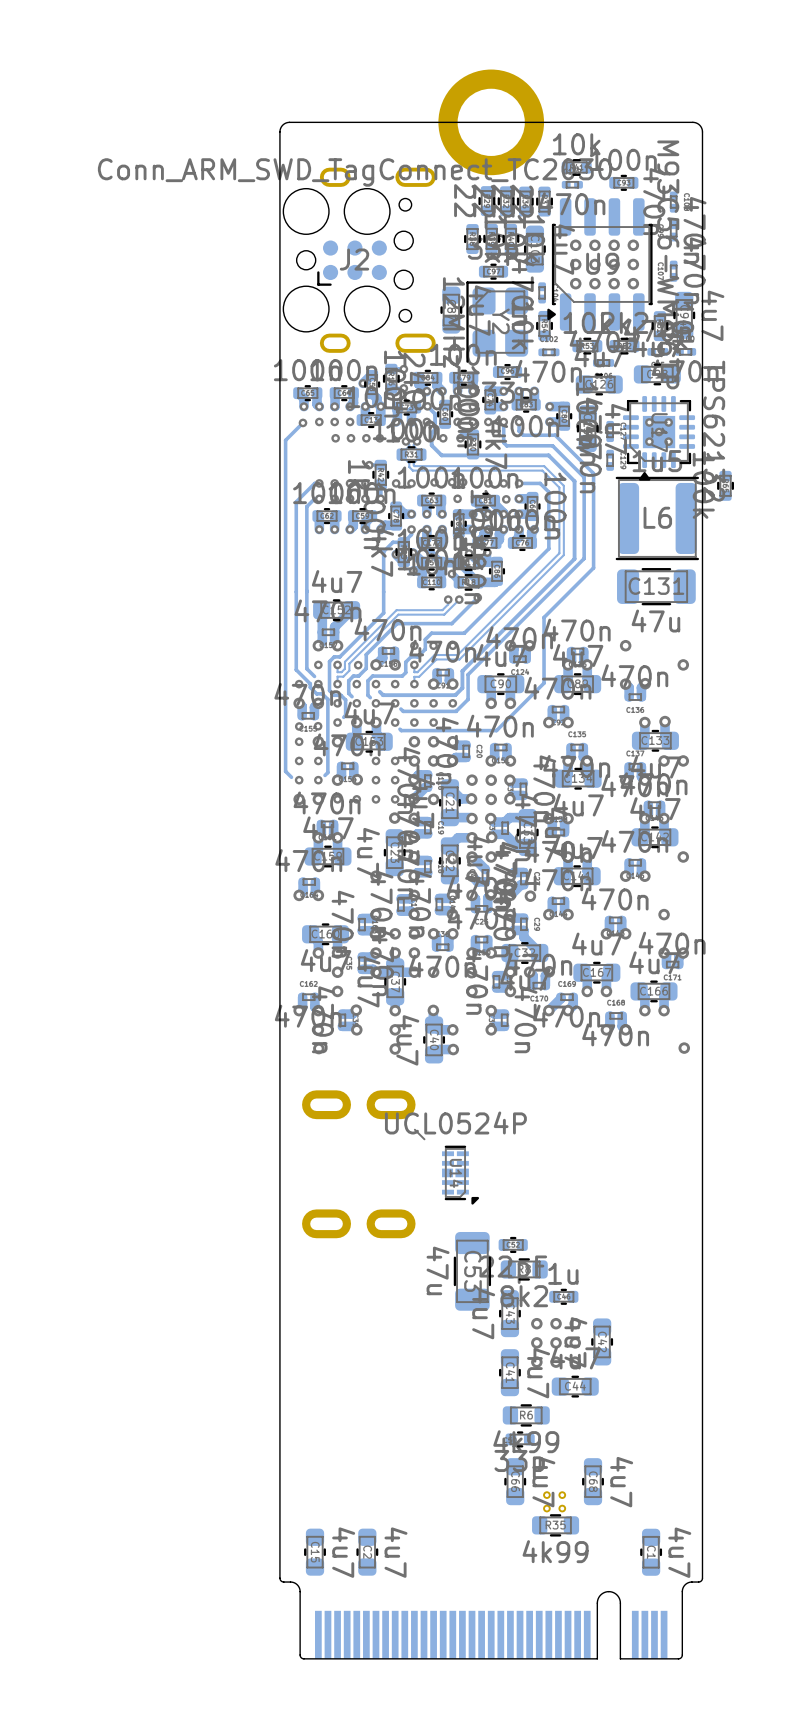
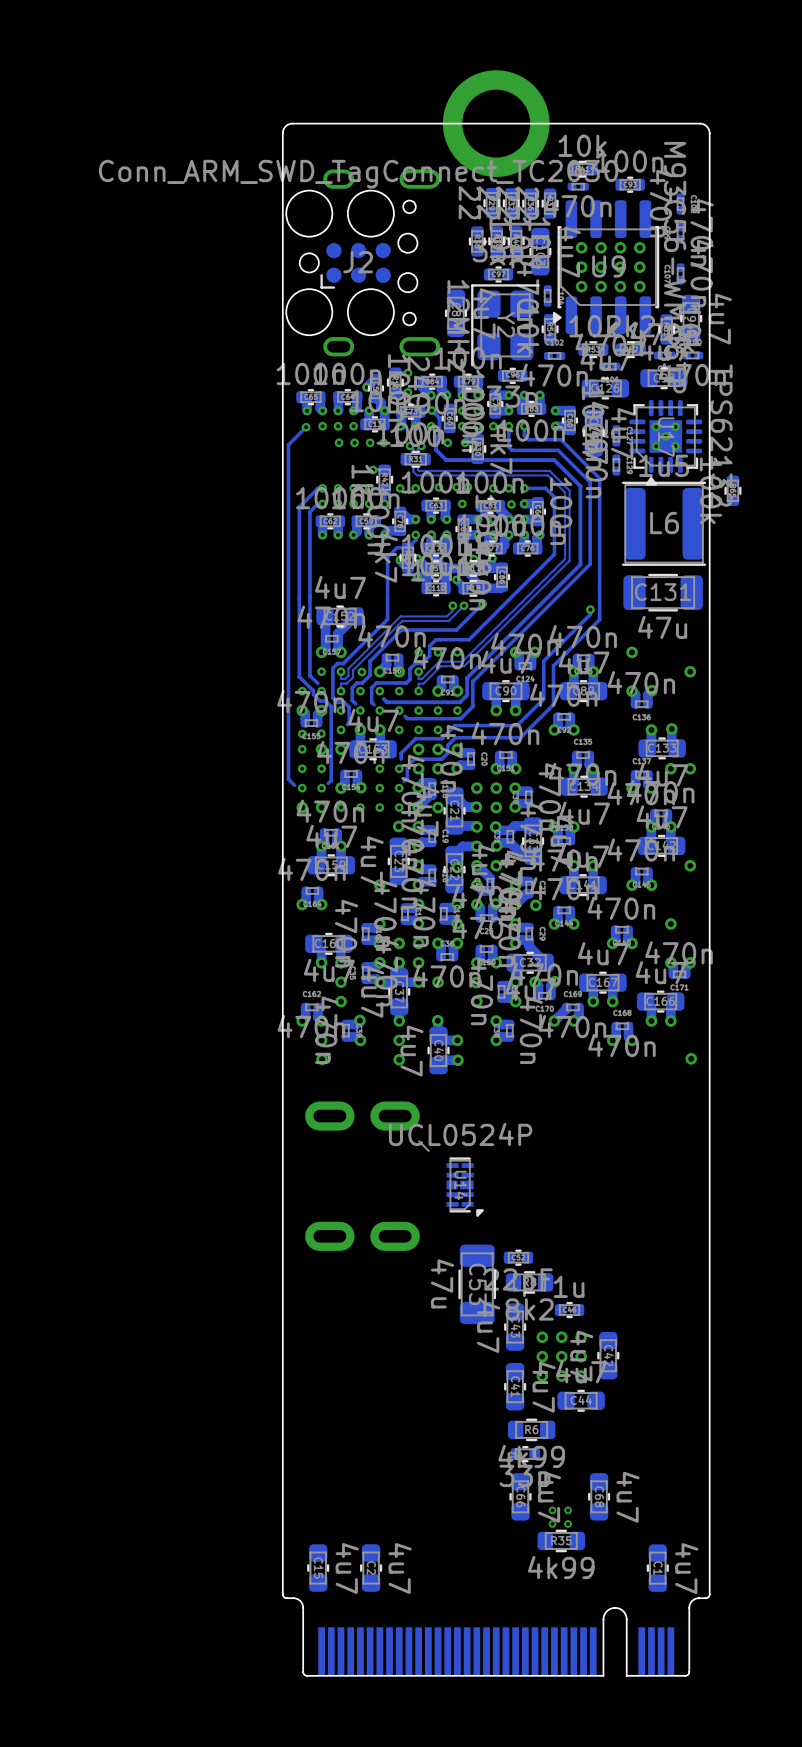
track: (593, 567) (544, 617) (544, 683) (496, 730) (399, 729) -> (599, 573) (599, 619) (553, 665) (553, 704) (520, 737) (455, 737) (447, 745) (447, 753) (441, 759) (414, 759) (407, 766) (407, 778) (404, 781)
track: none -> (590, 609) (590, 614) (543, 661) (543, 698) (517, 725) (455, 725) (441, 738) (415, 738) (401, 753) (401, 759)
via: none -> (590, 609)

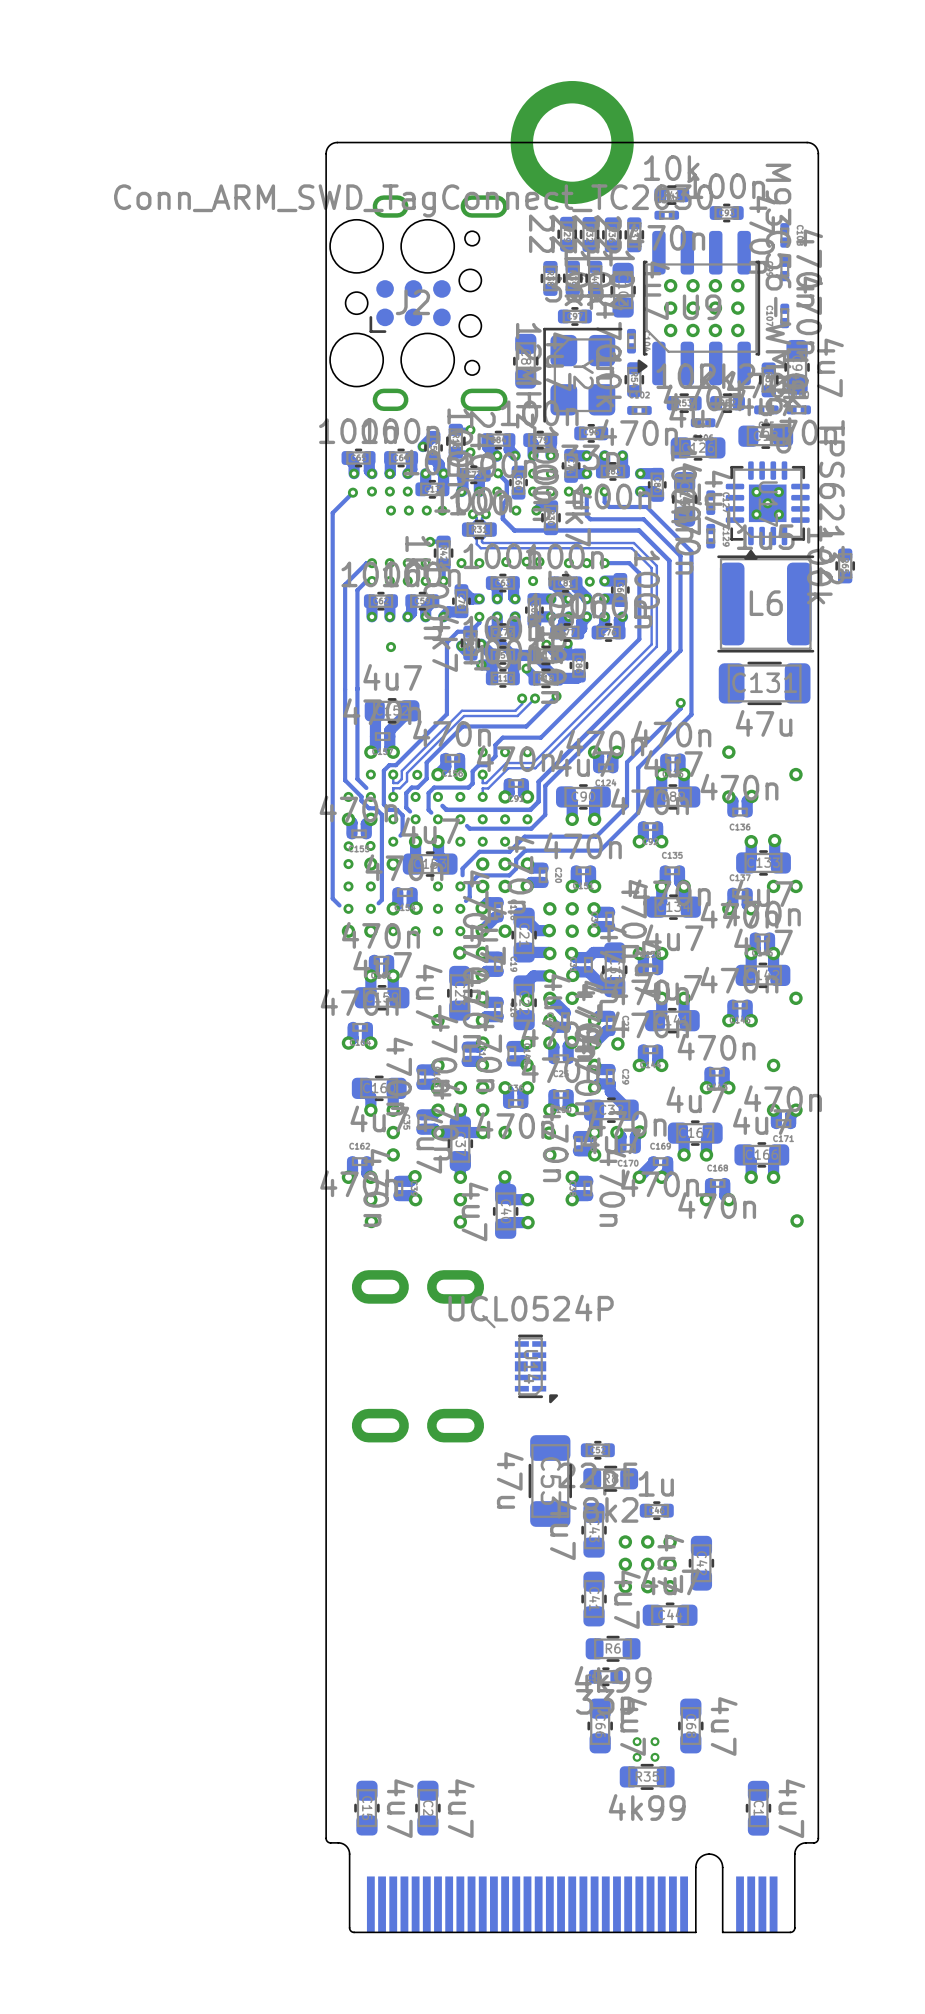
via: none -> (391, 647)

